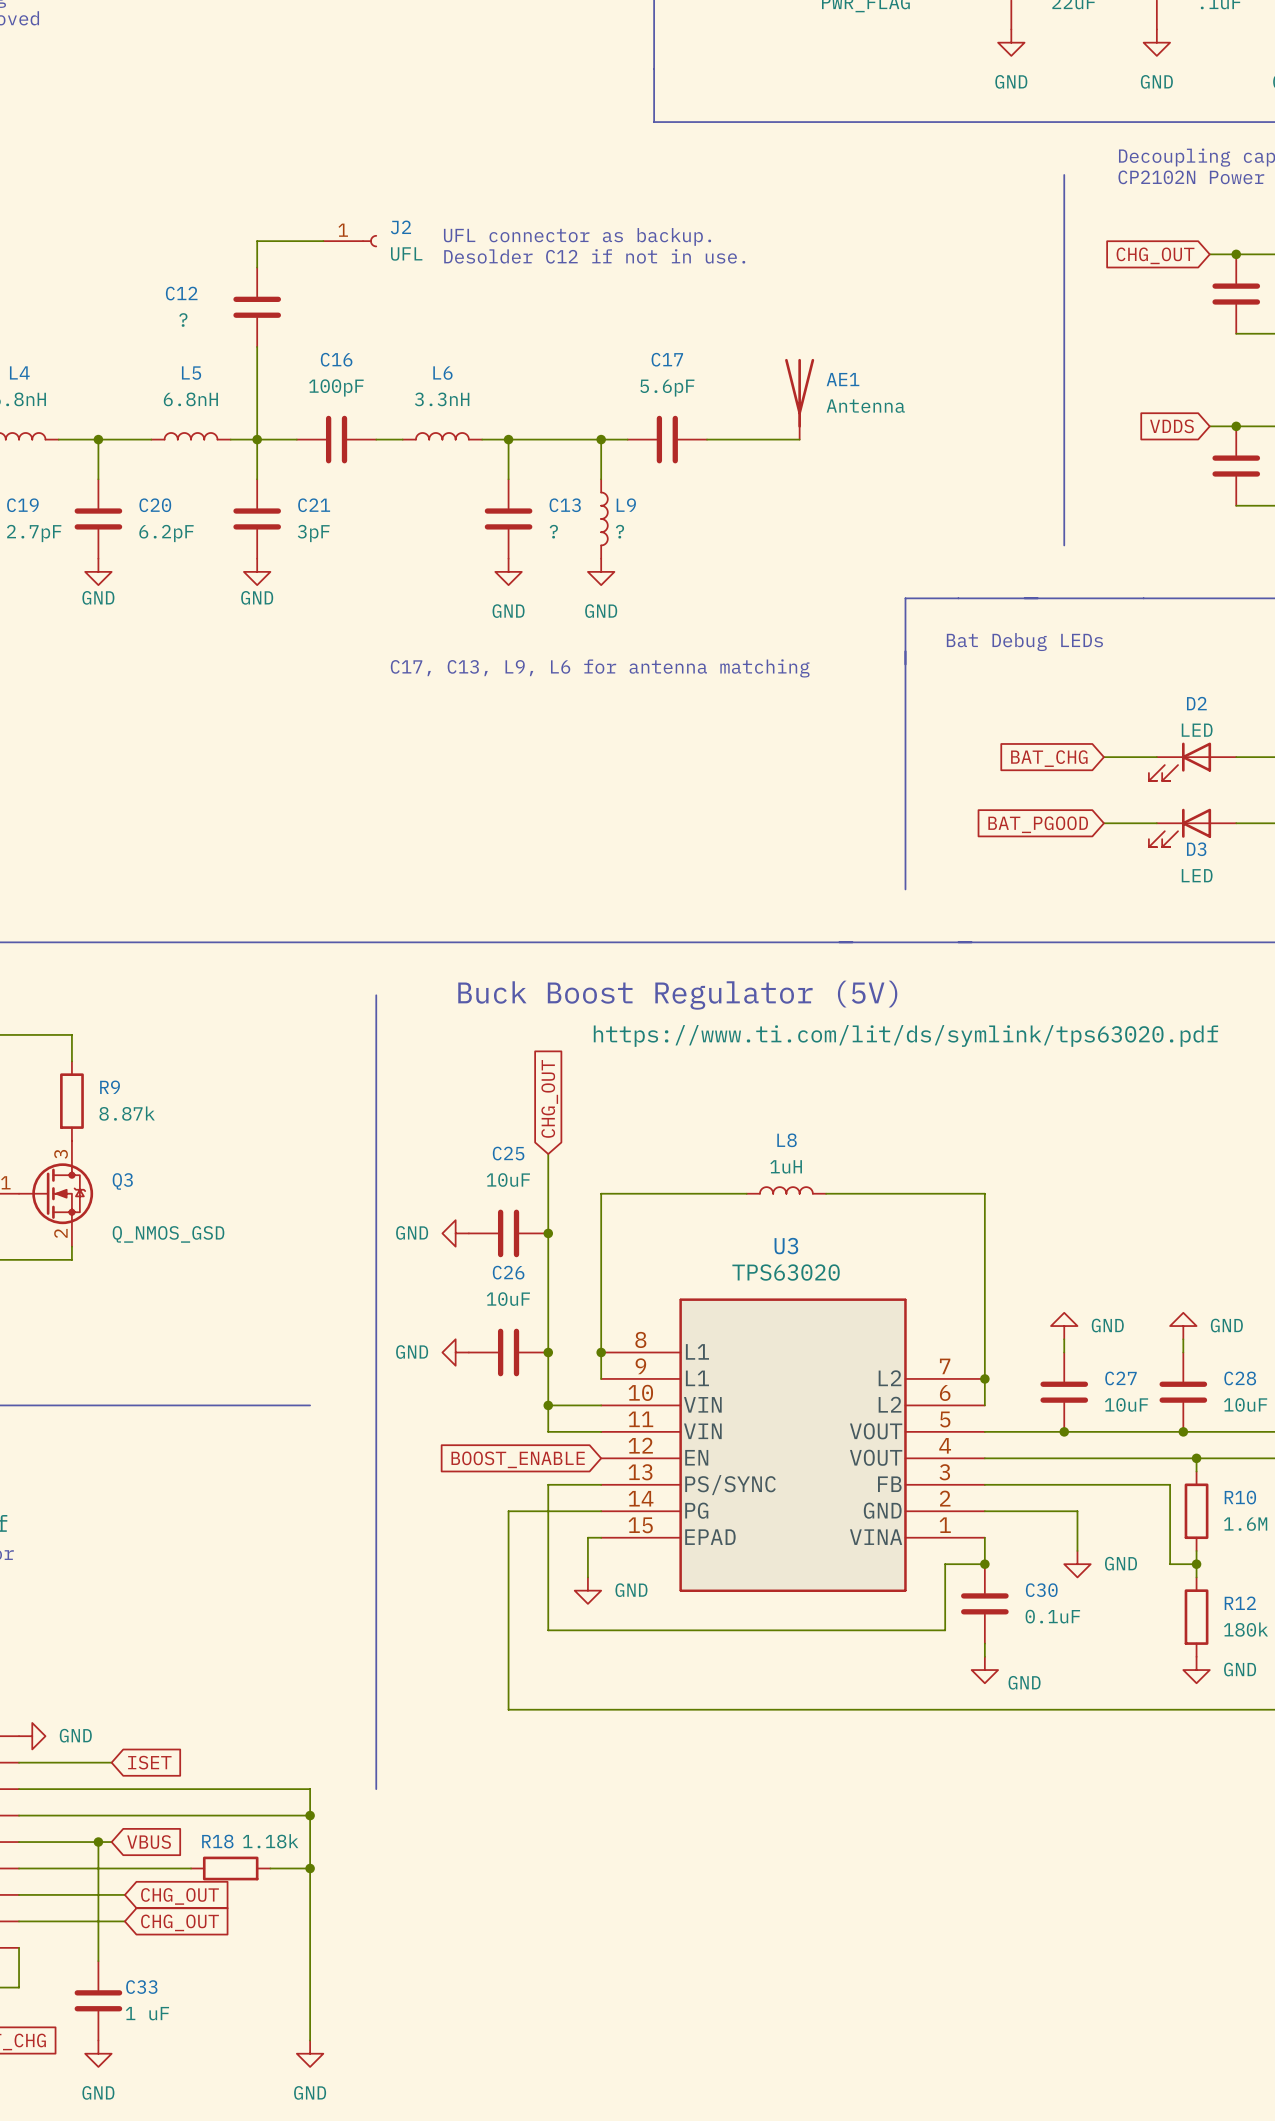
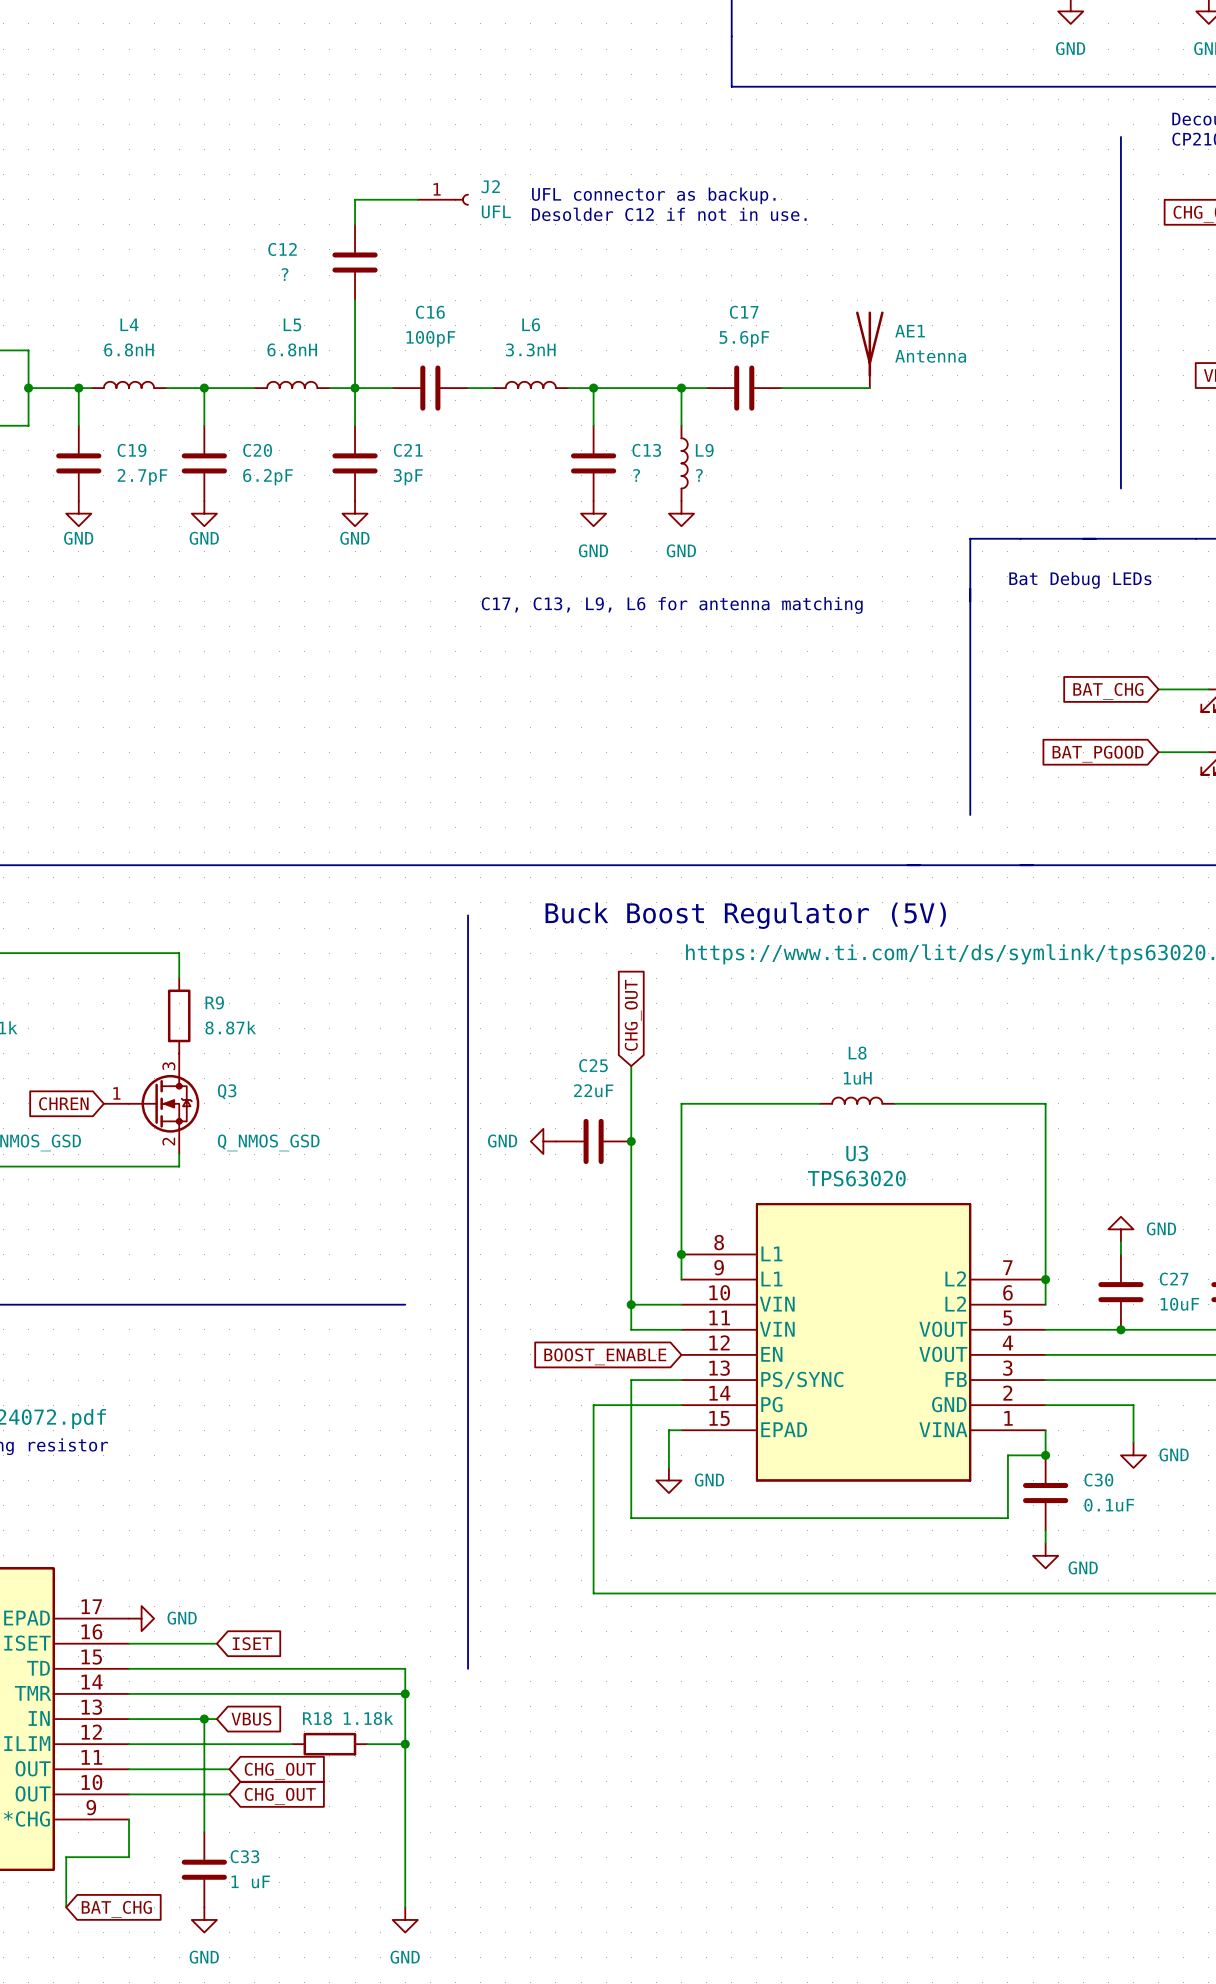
C25 value: 10uF (508, 1180) -> 22uF (593, 1090)
power symbol: GND (455, 1352) -> none
C26: 10uF (508, 1352) -> none
junction: (548, 1352) -> none

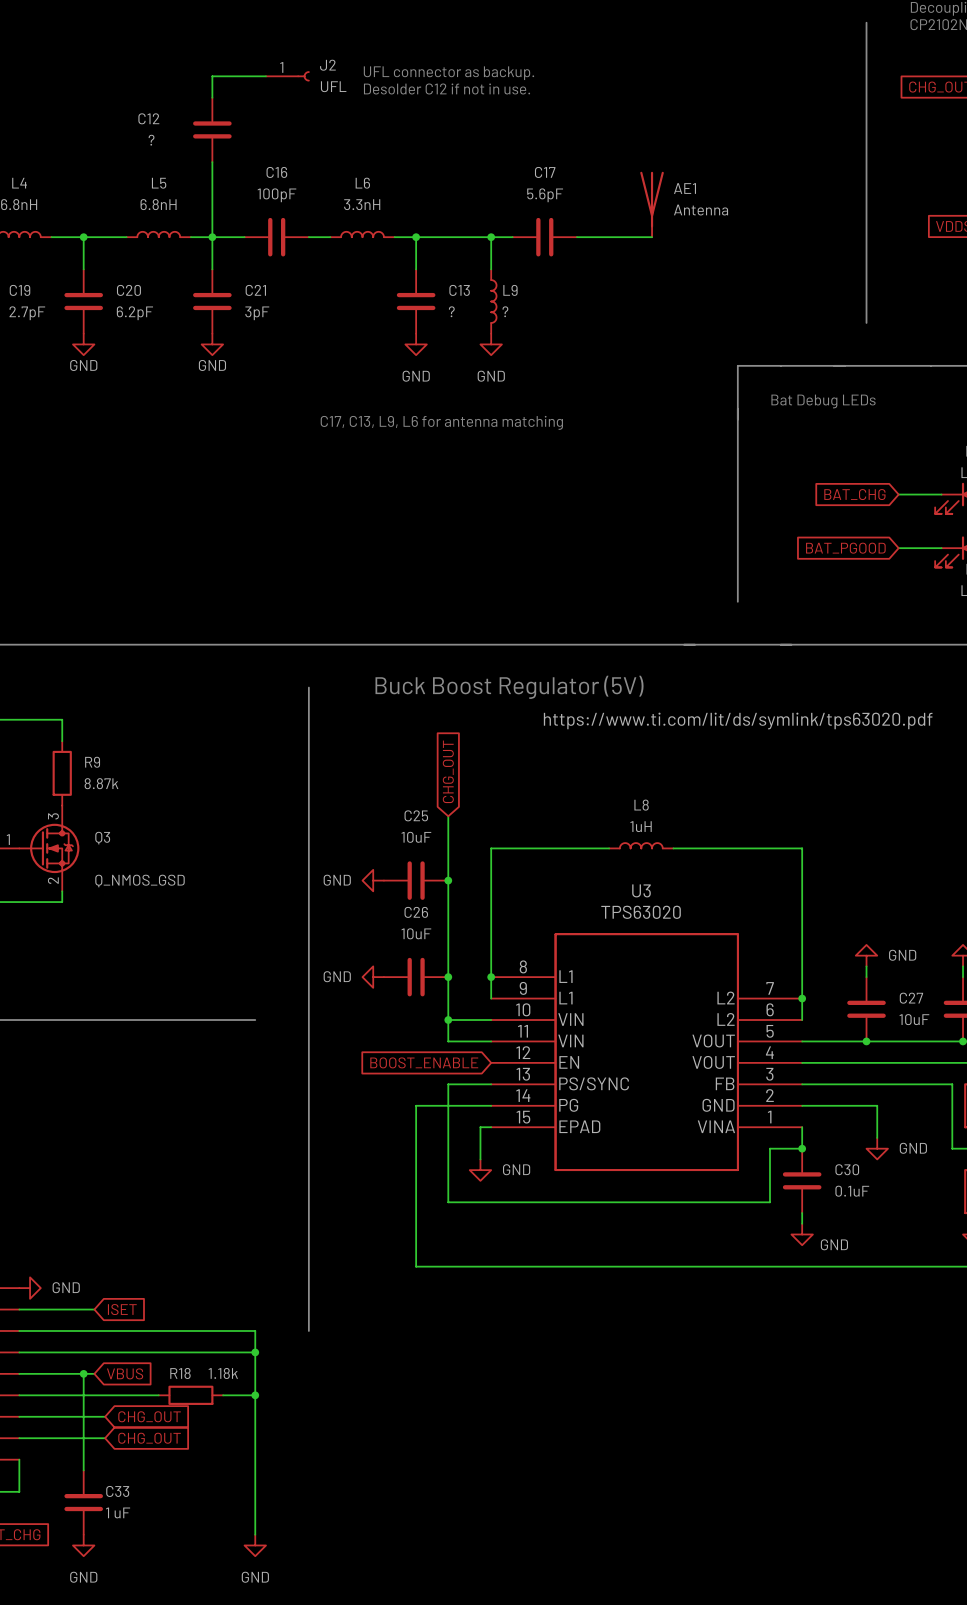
C25 value: 22uF (593, 1090) -> 10uF (416, 837)
power symbol: none -> GND (373, 977)
C26: none -> 10uF (416, 977)
junction: none -> (448, 977)

